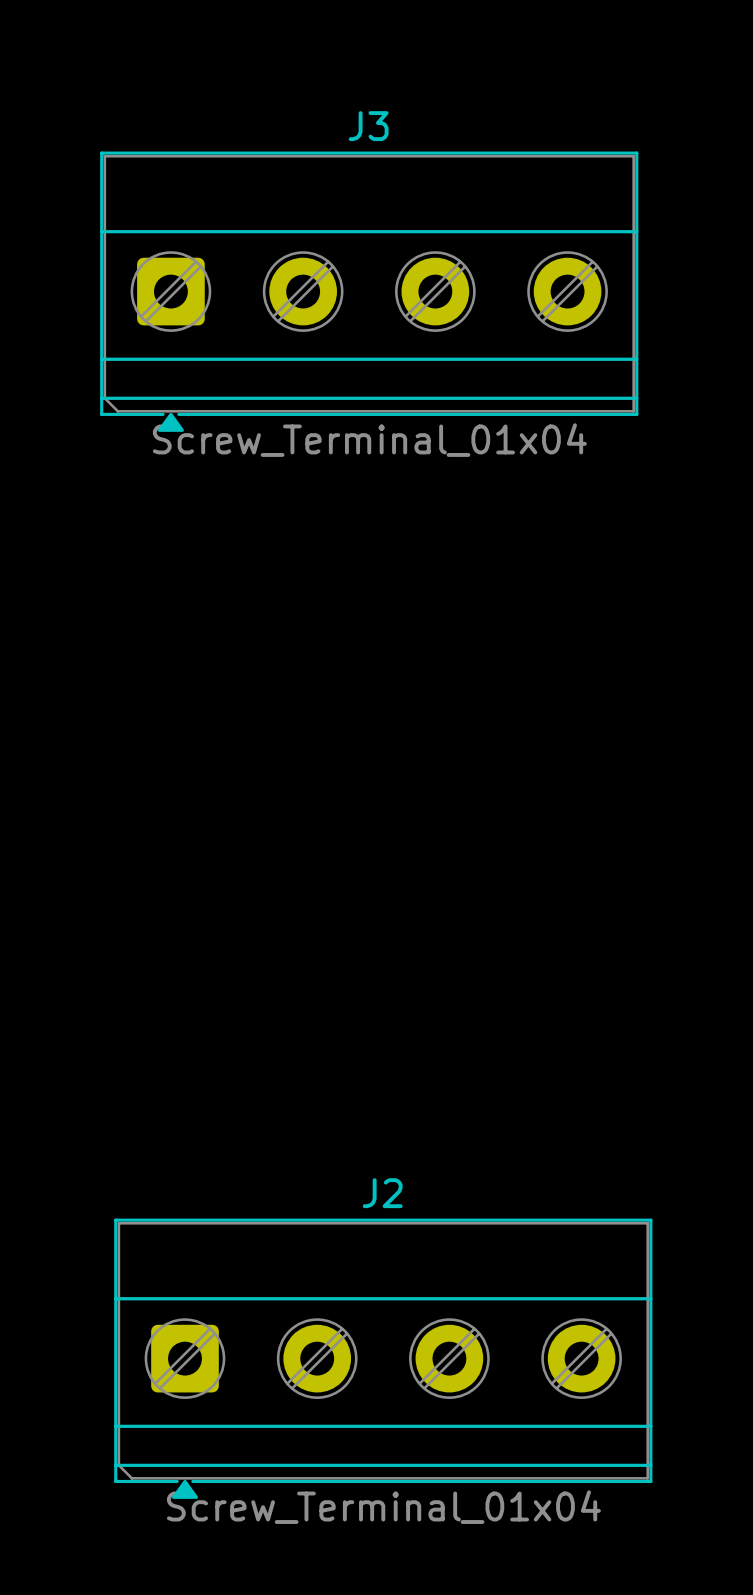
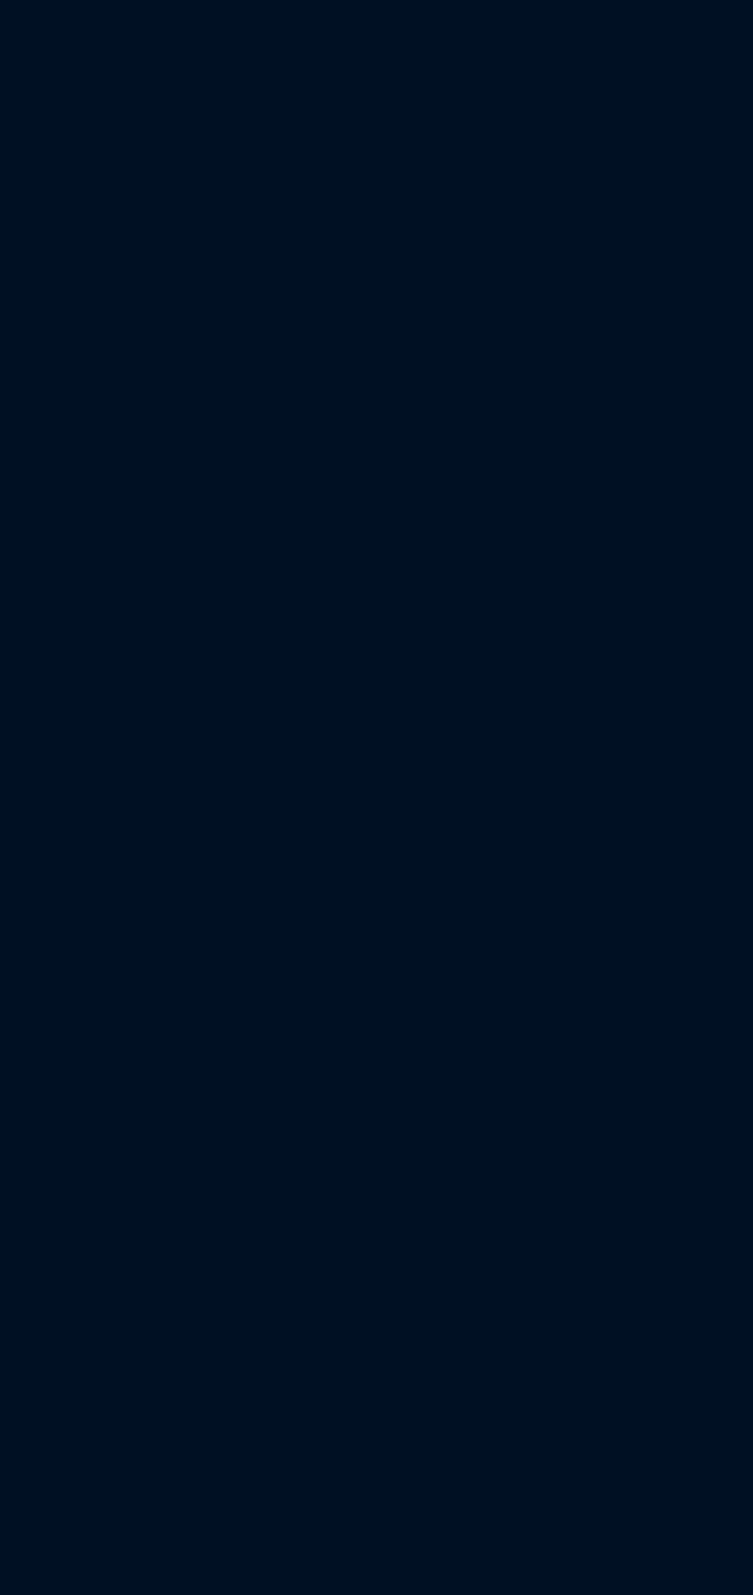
J3: Screw_Terminal_01x04 (369, 291) -> none
J2: Screw_Terminal_01x04 (383, 1358) -> none

